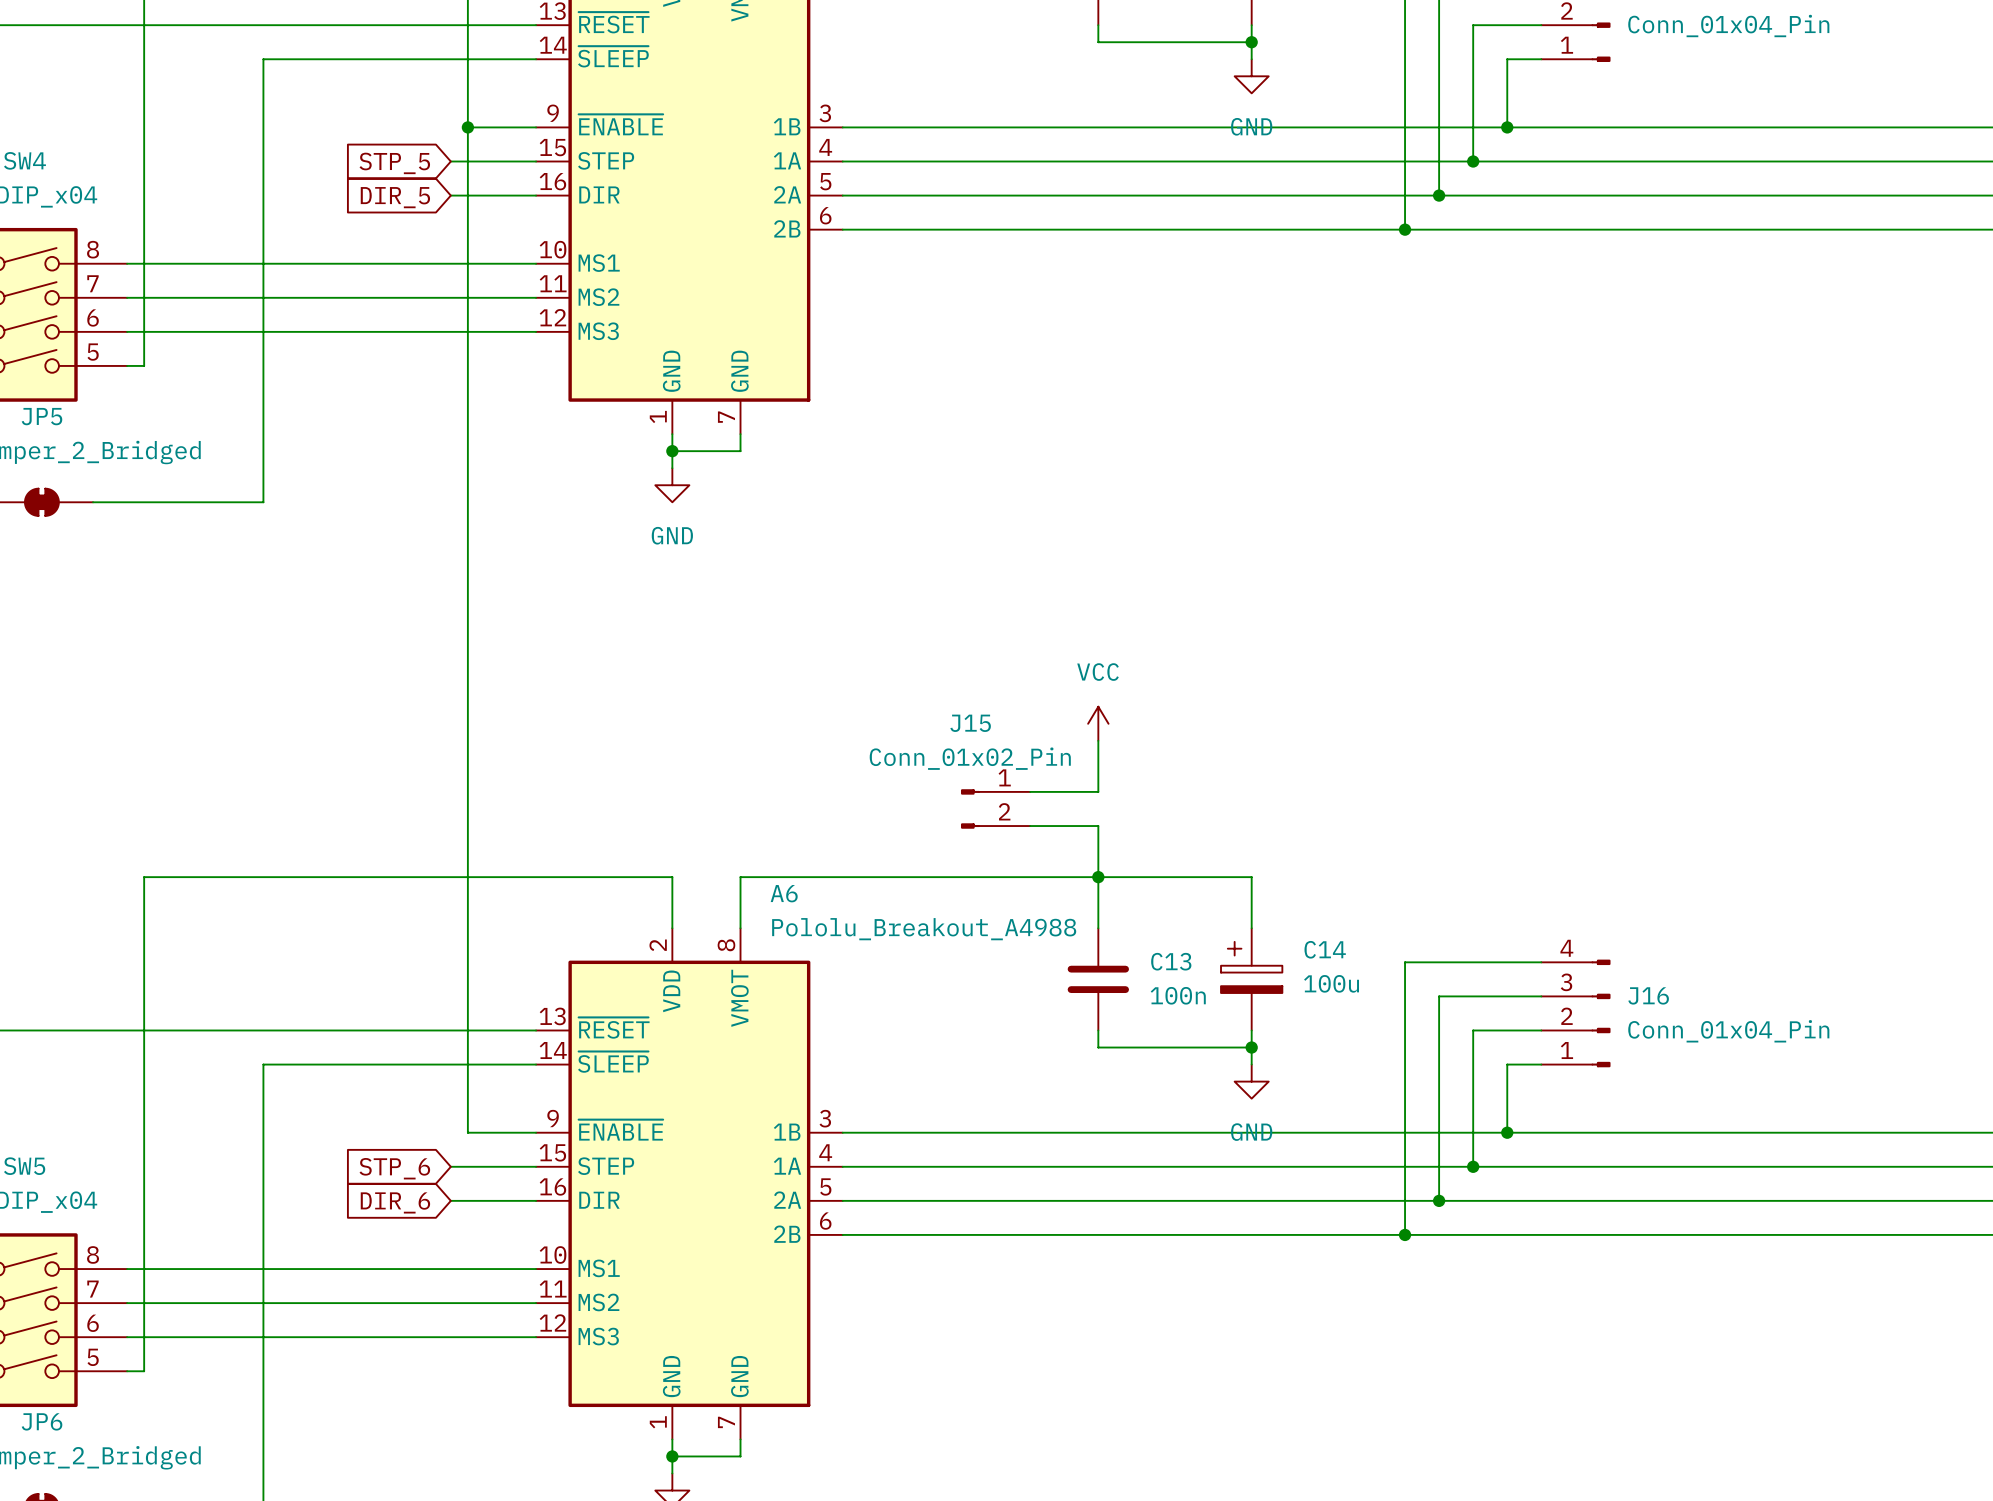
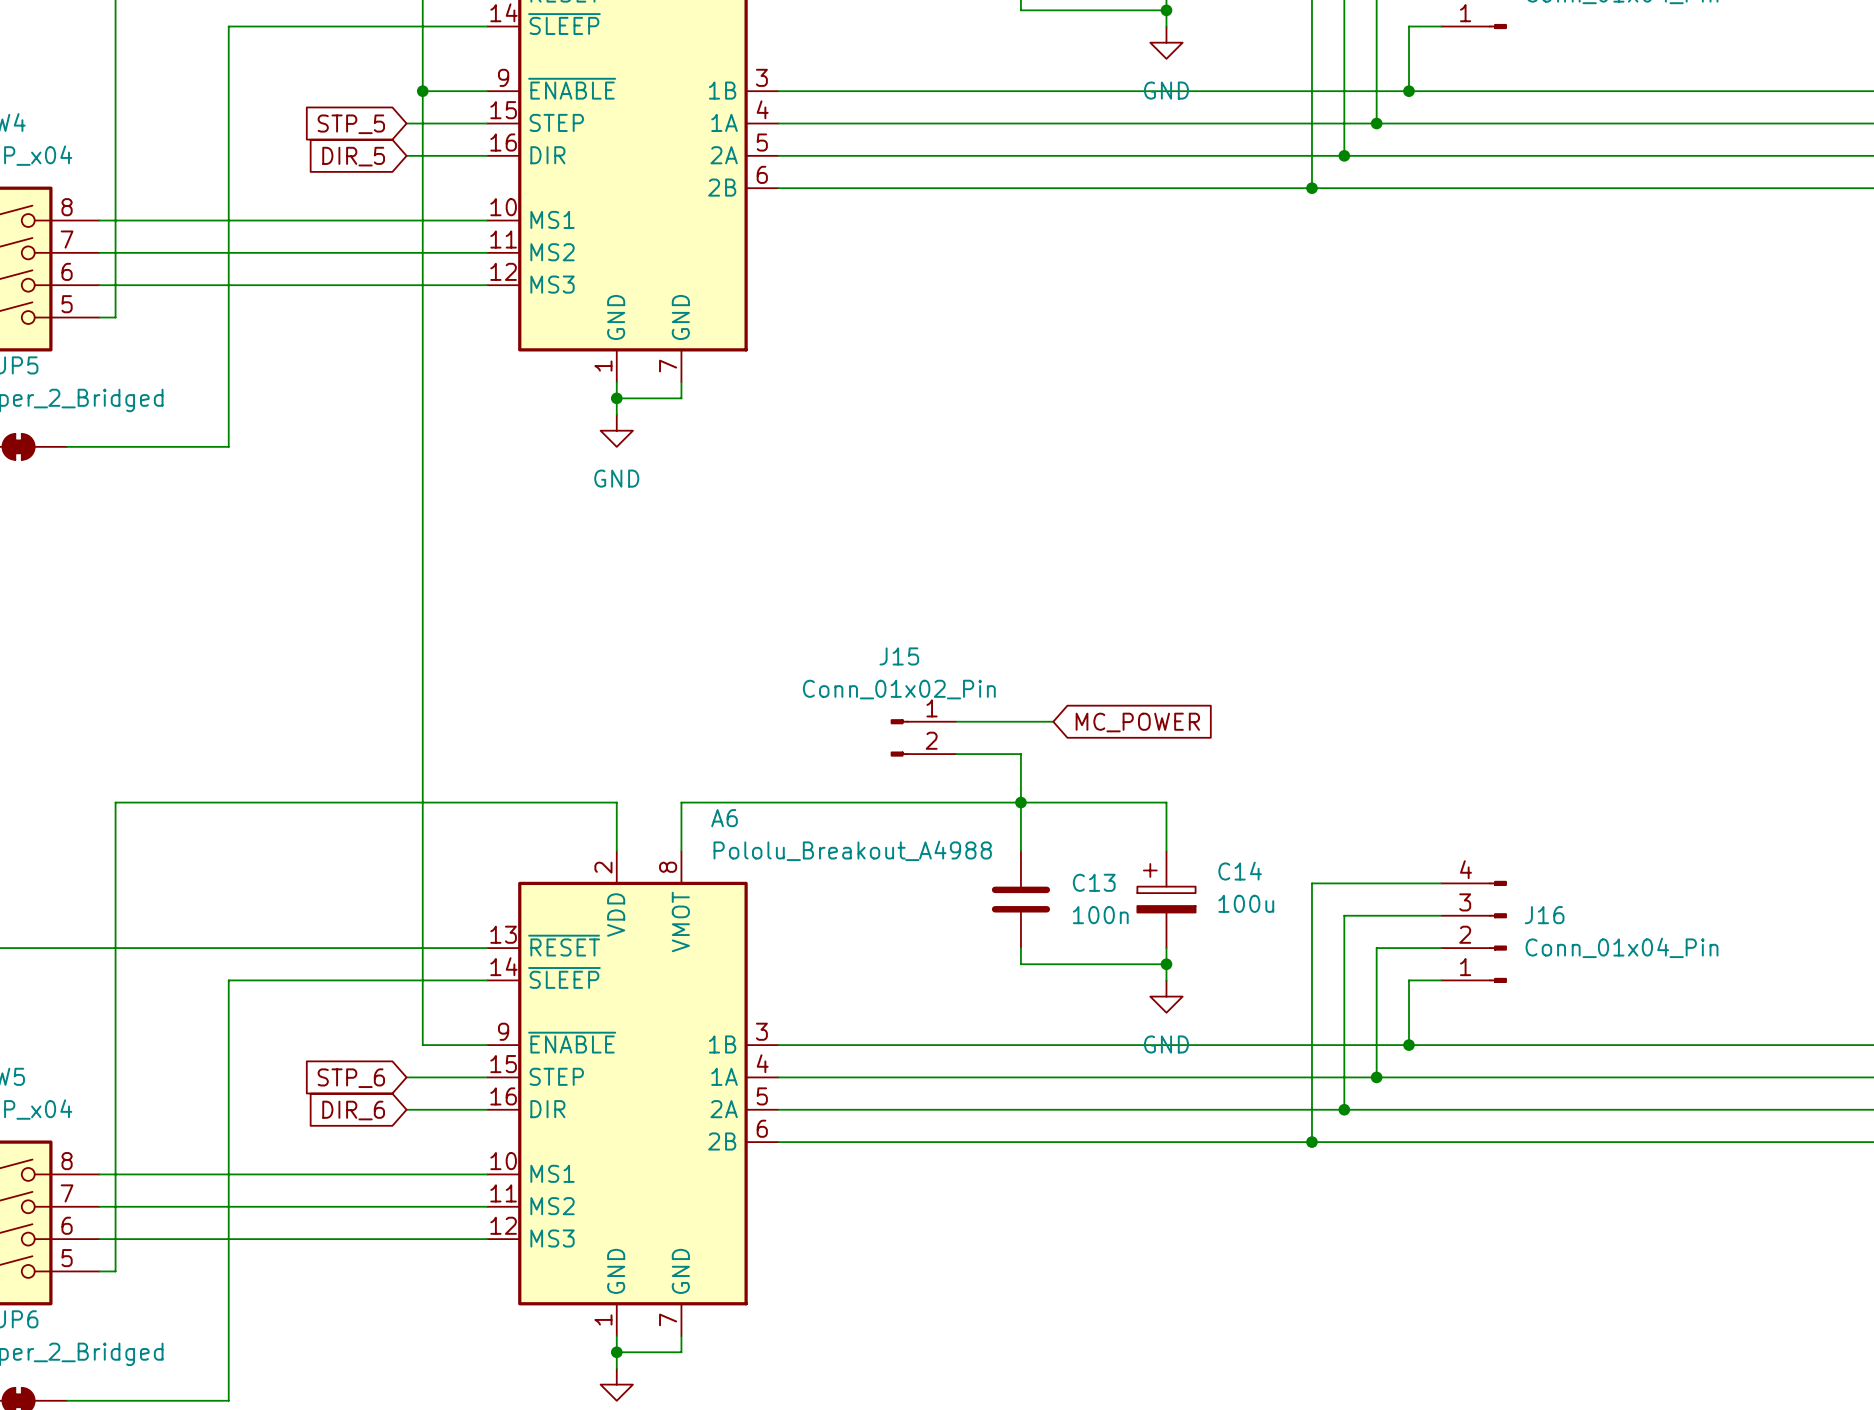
power symbol: VCC (1098, 723) -> none
wire: (1098, 740) (1098, 791) -> (1053, 721) (1020, 721)
global label: none -> MC_POWER (1137, 722)

